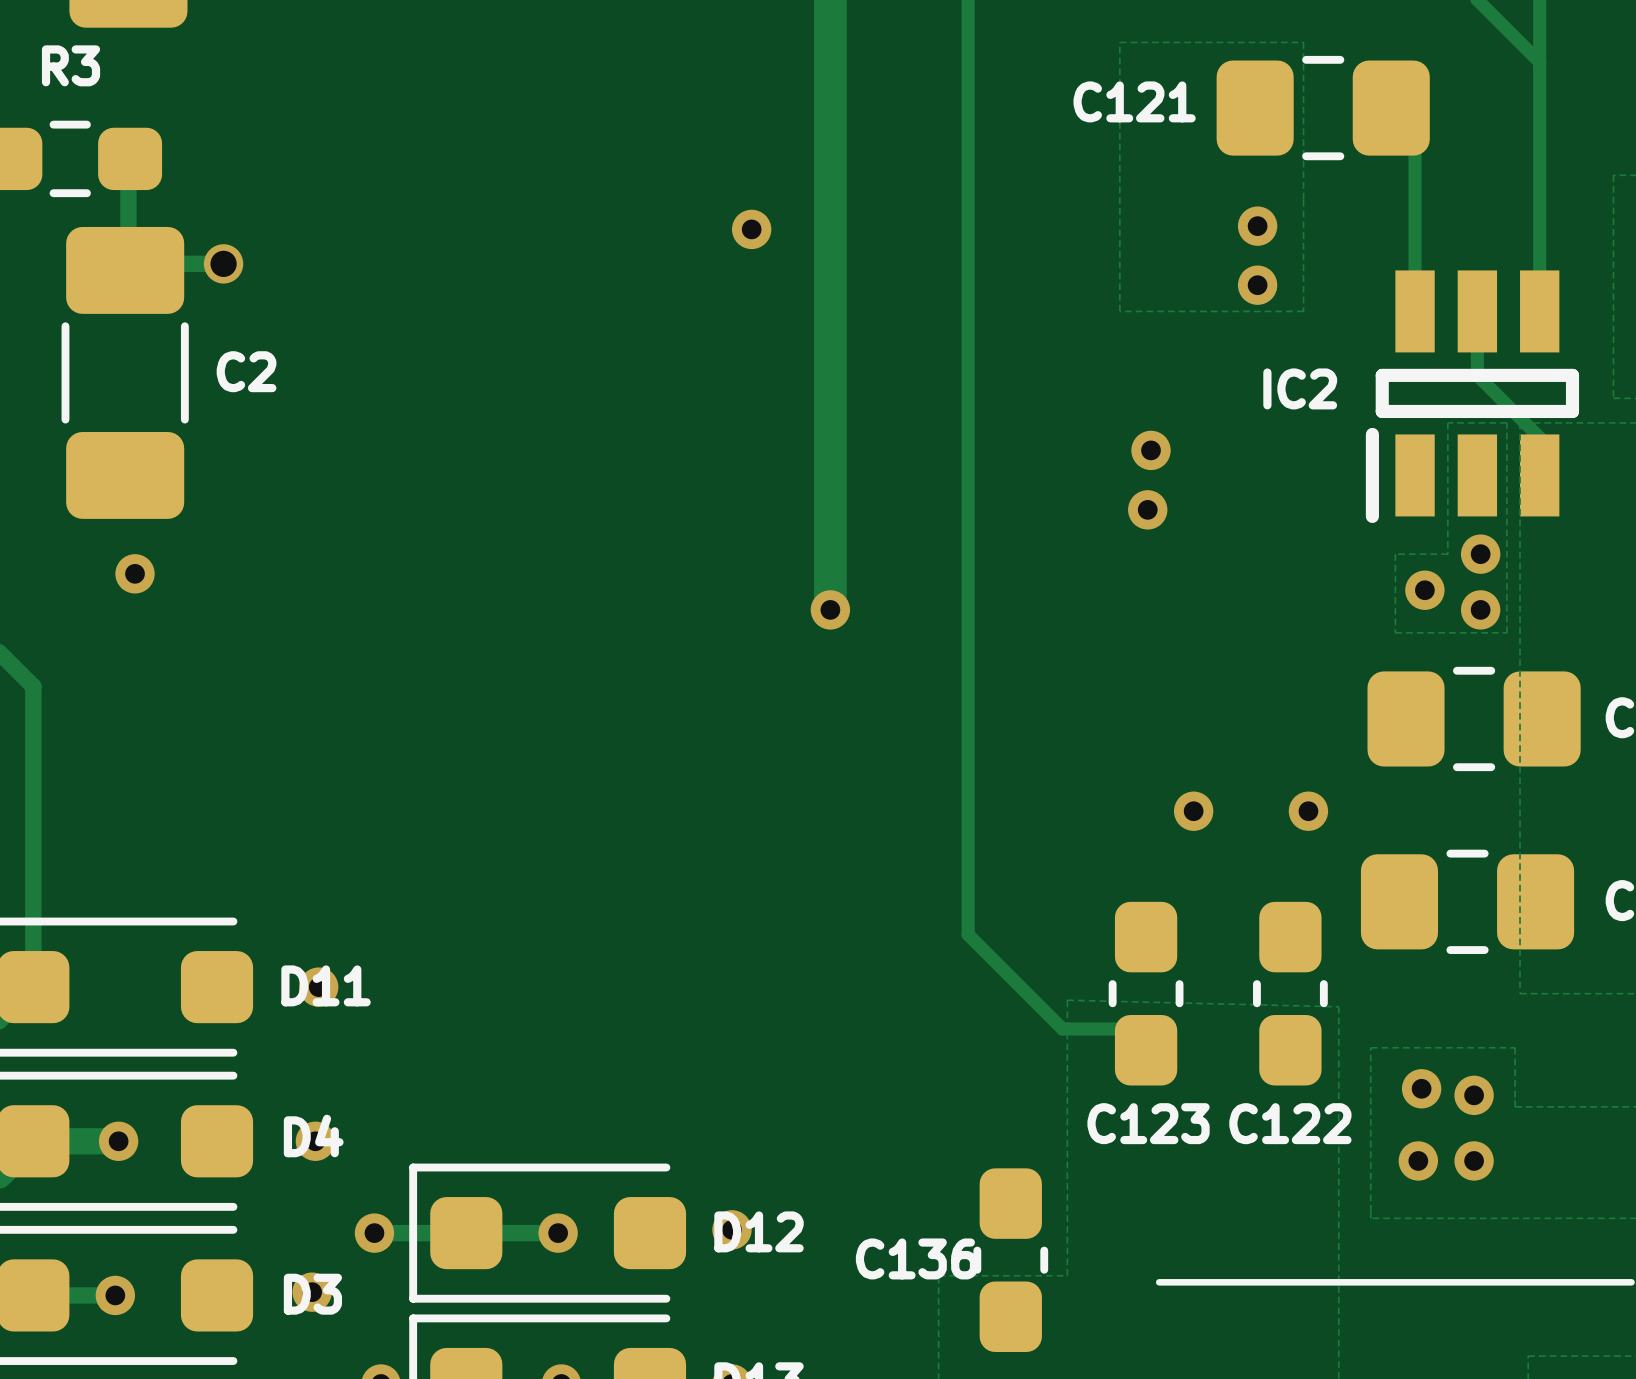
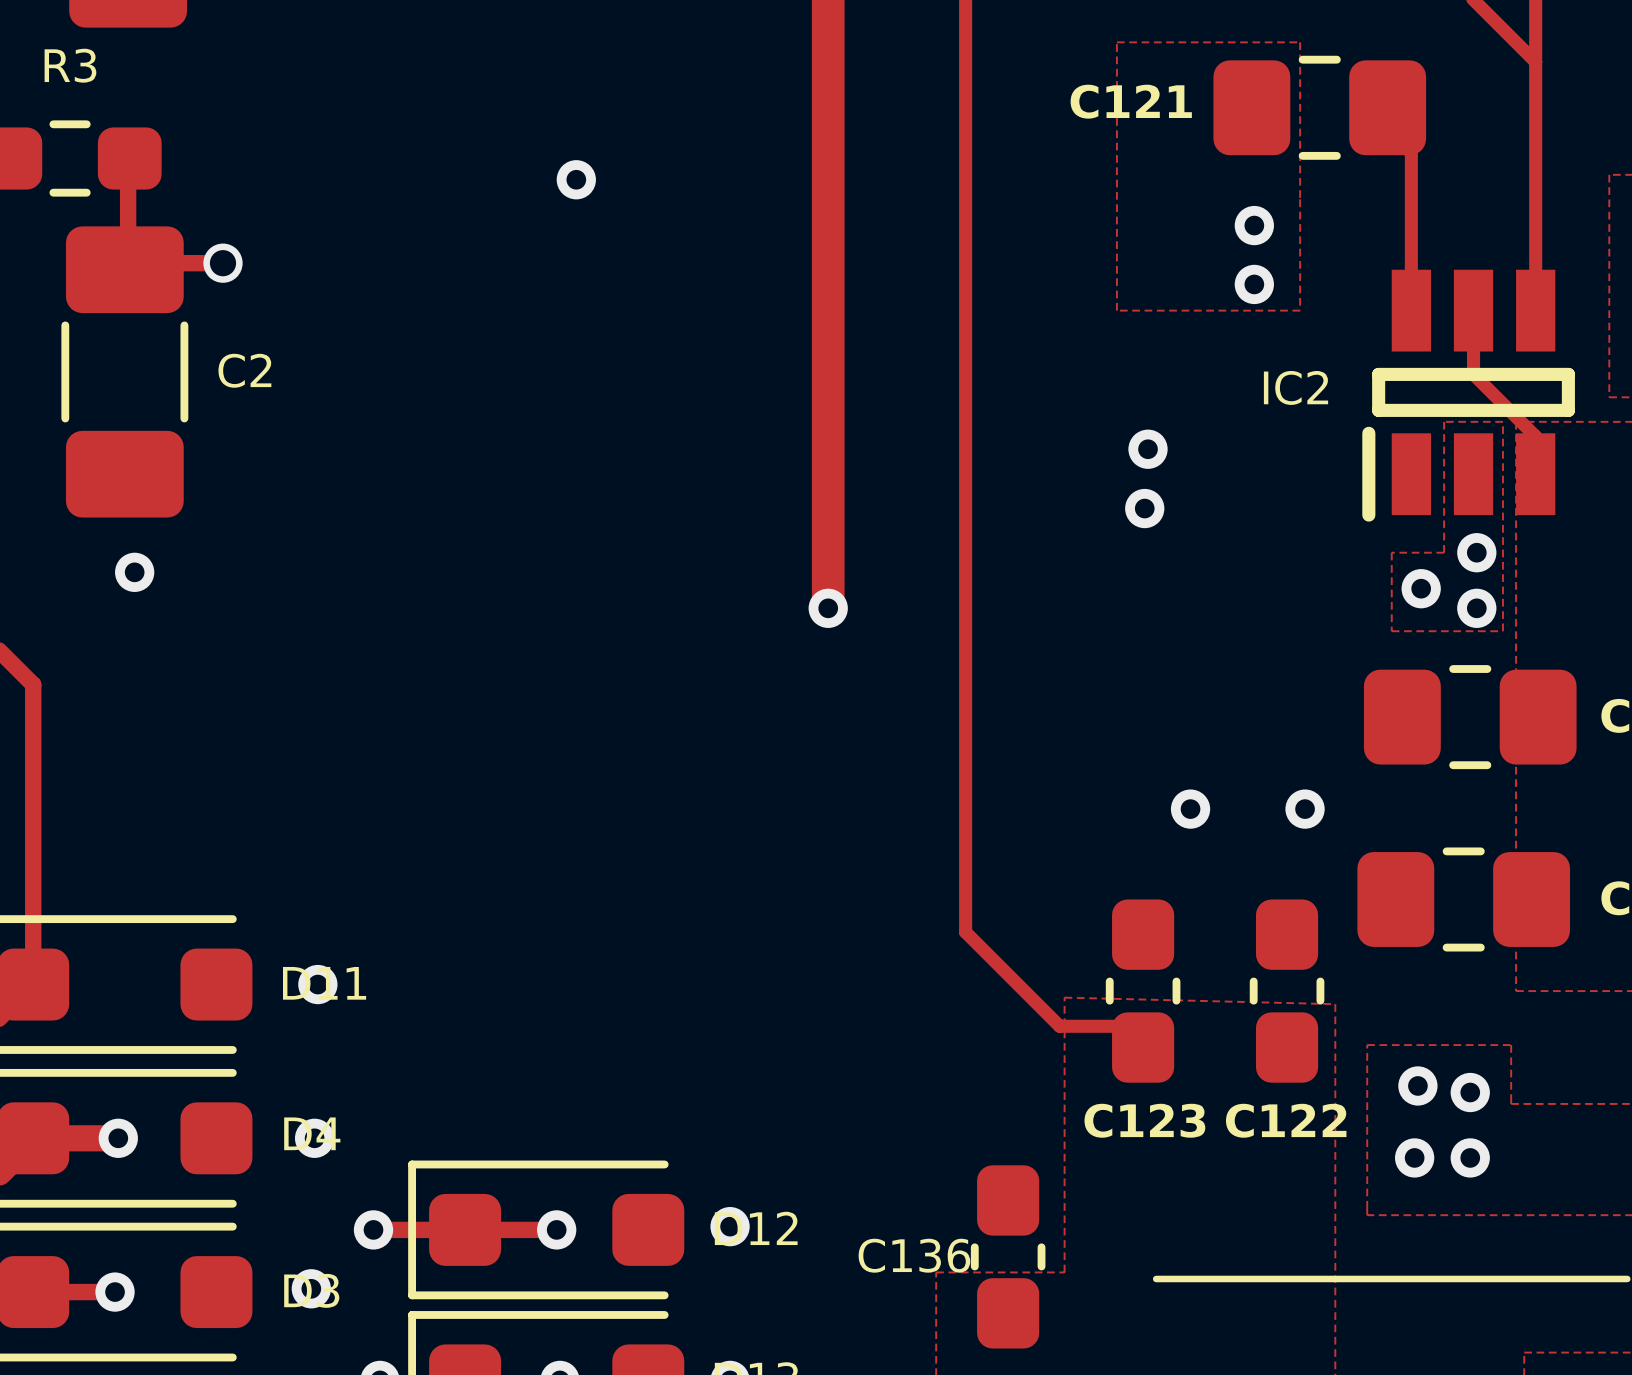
via position: (751, 229) -> (576, 179)

